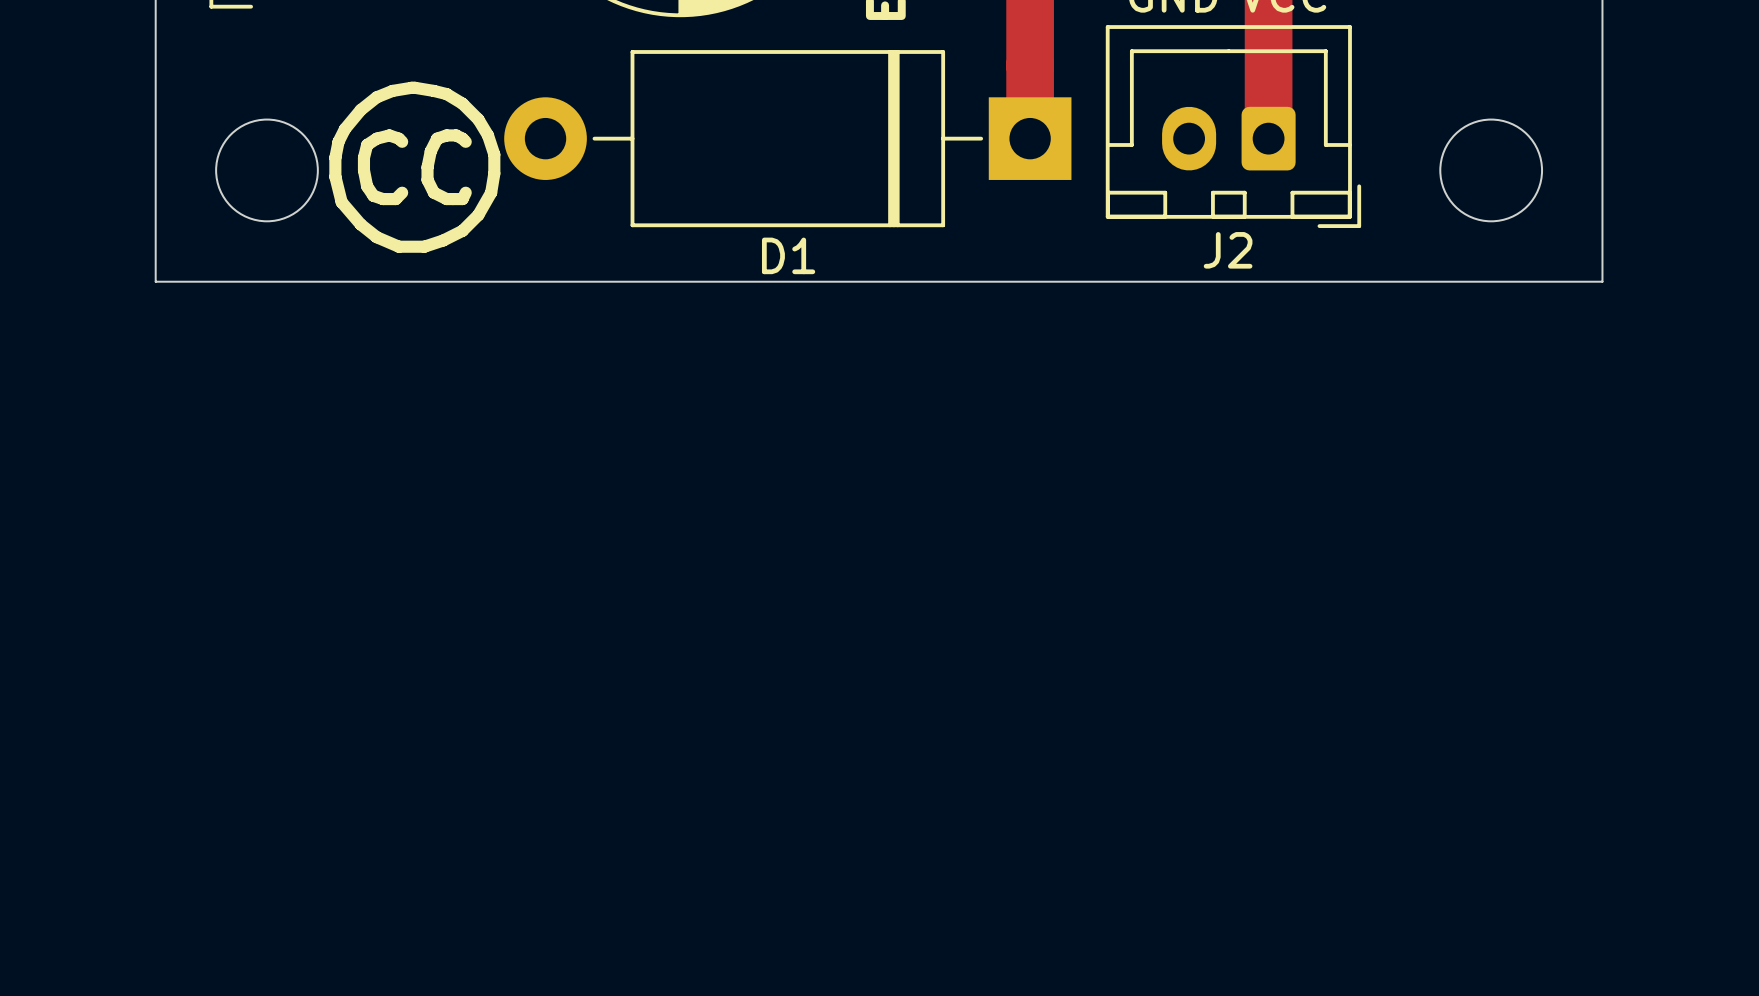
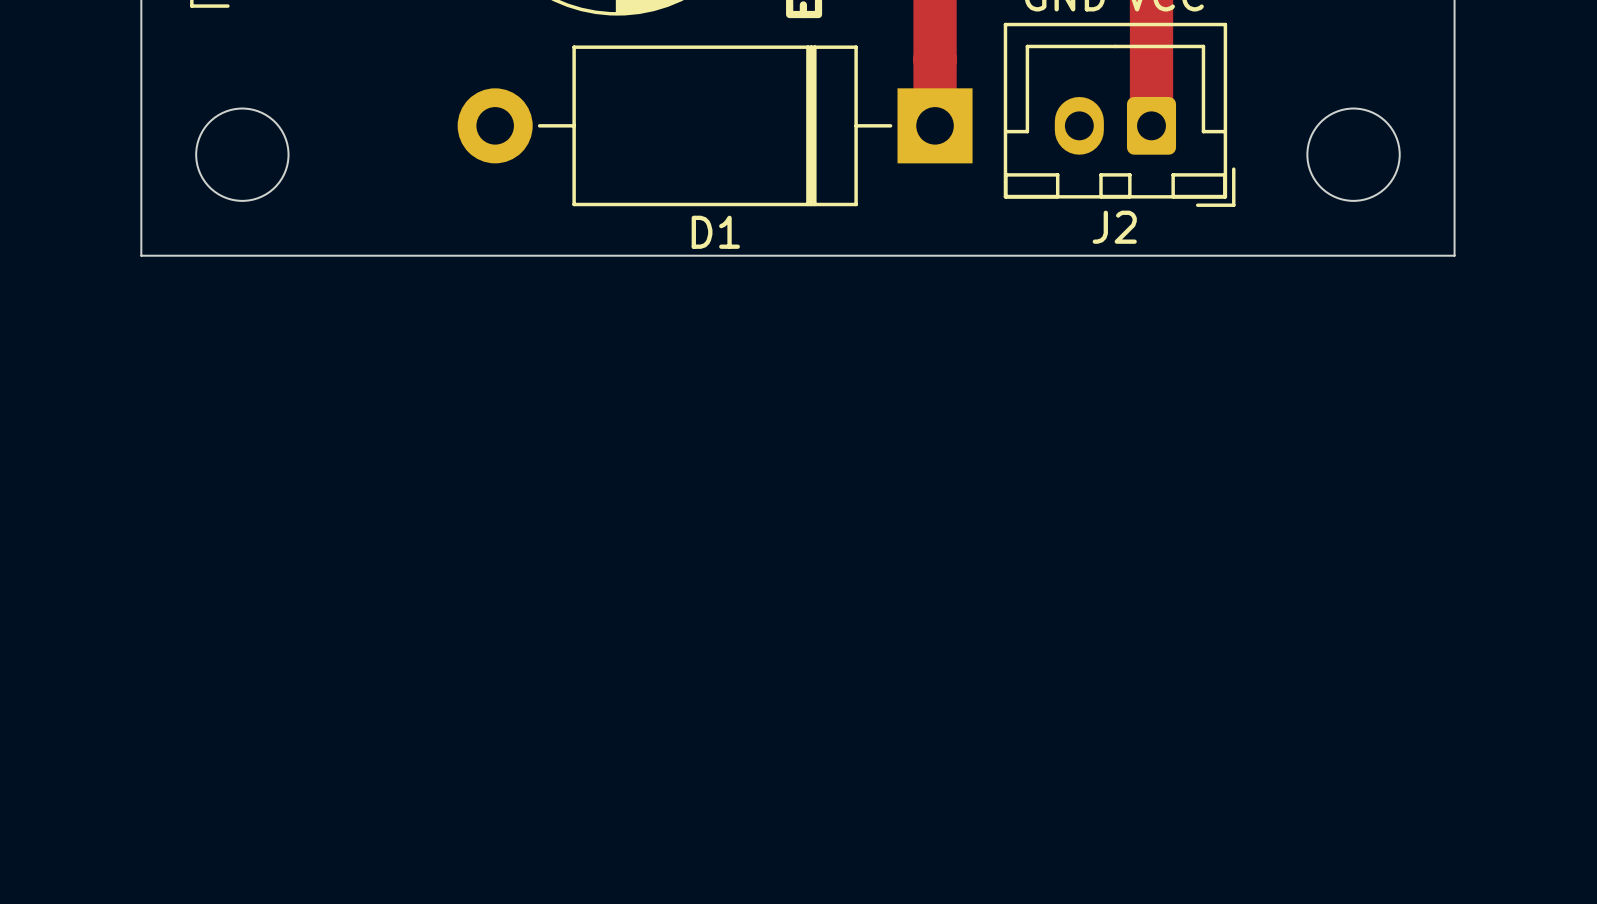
drawing: [329, 81, 501, 253] -> none

